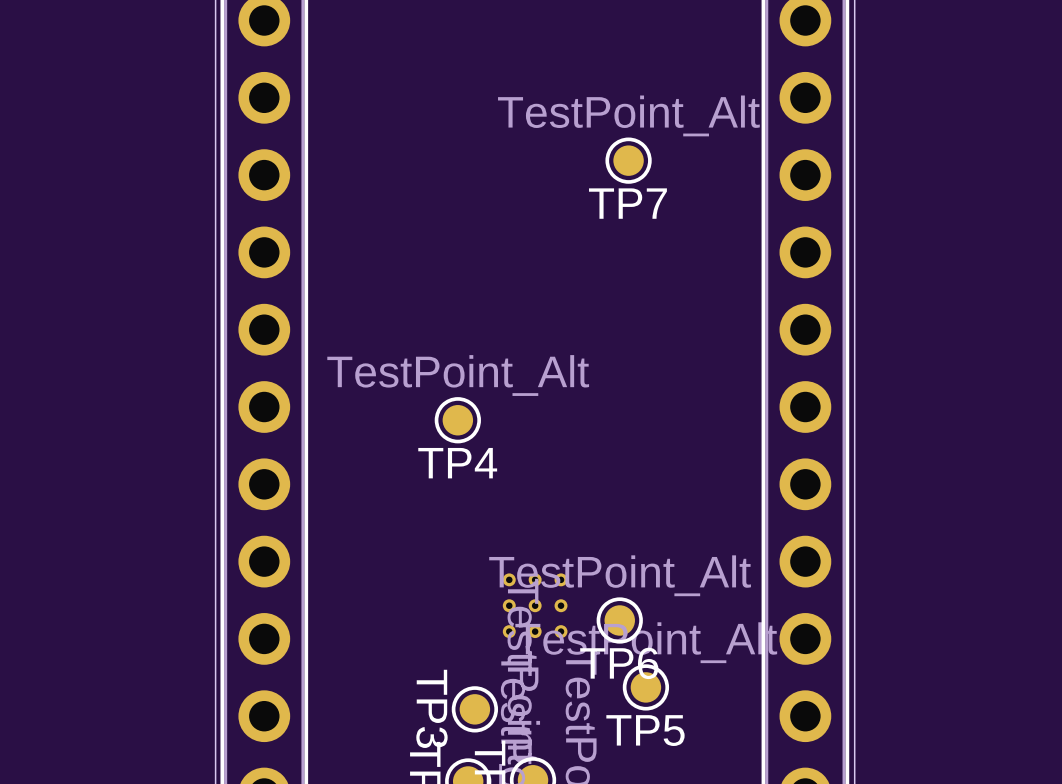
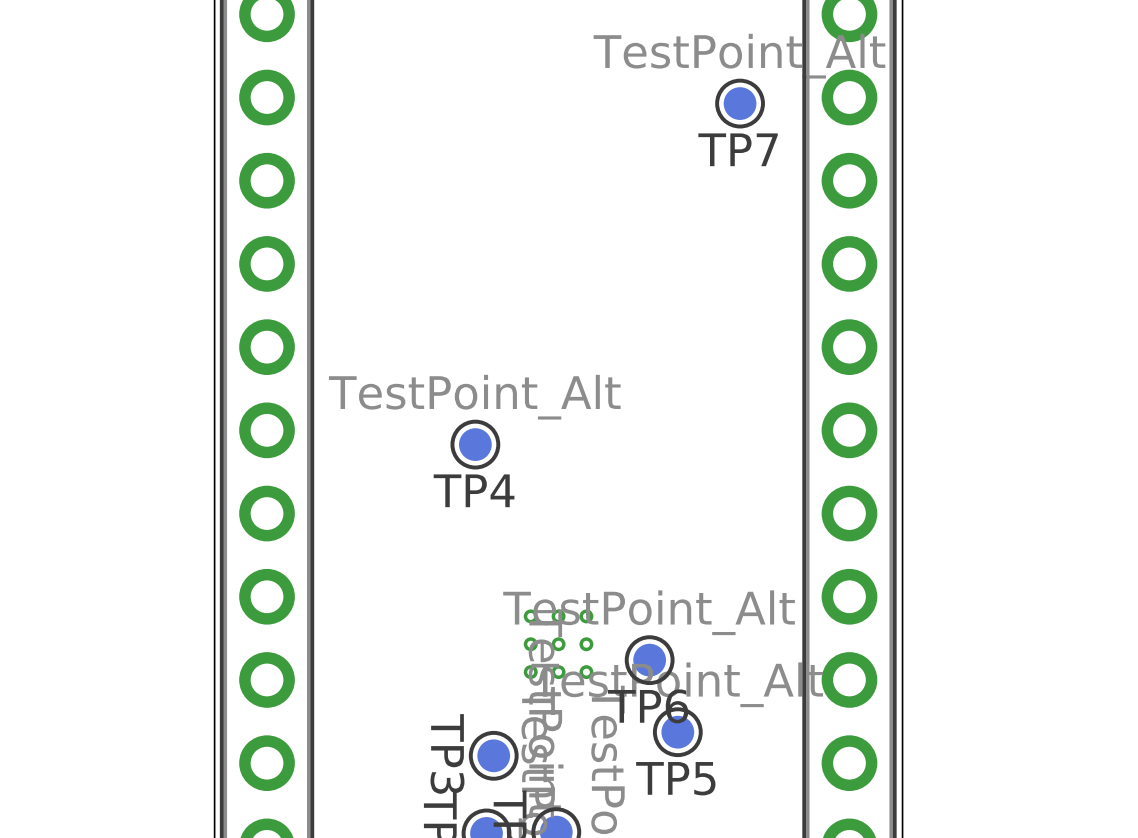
TP7 position: (628, 160) -> (740, 103)

